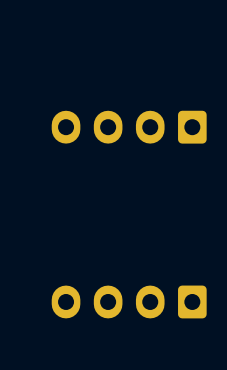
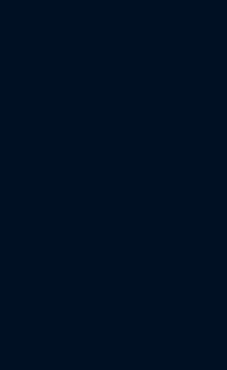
part: (129, 127) -> none
part: (129, 301) -> none

